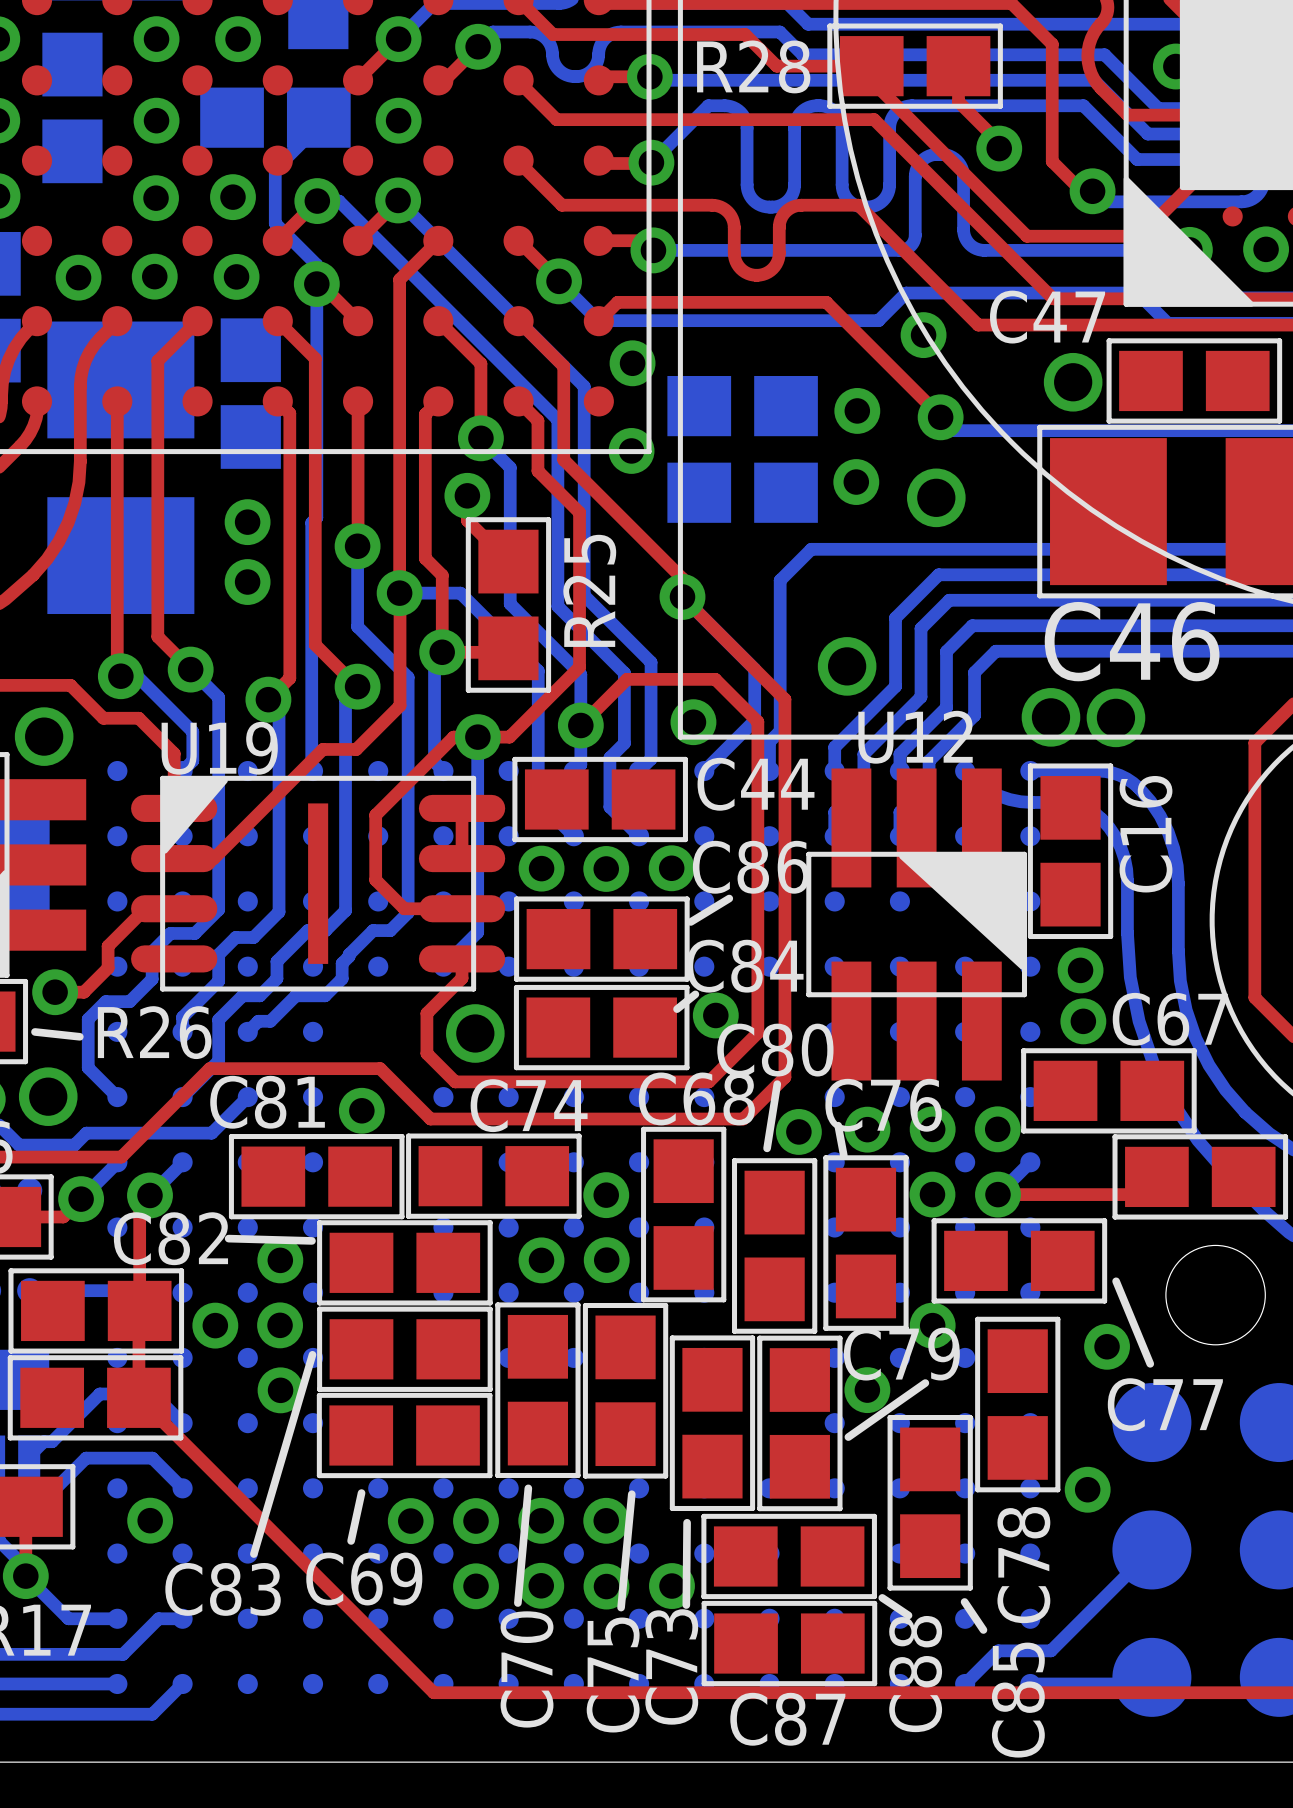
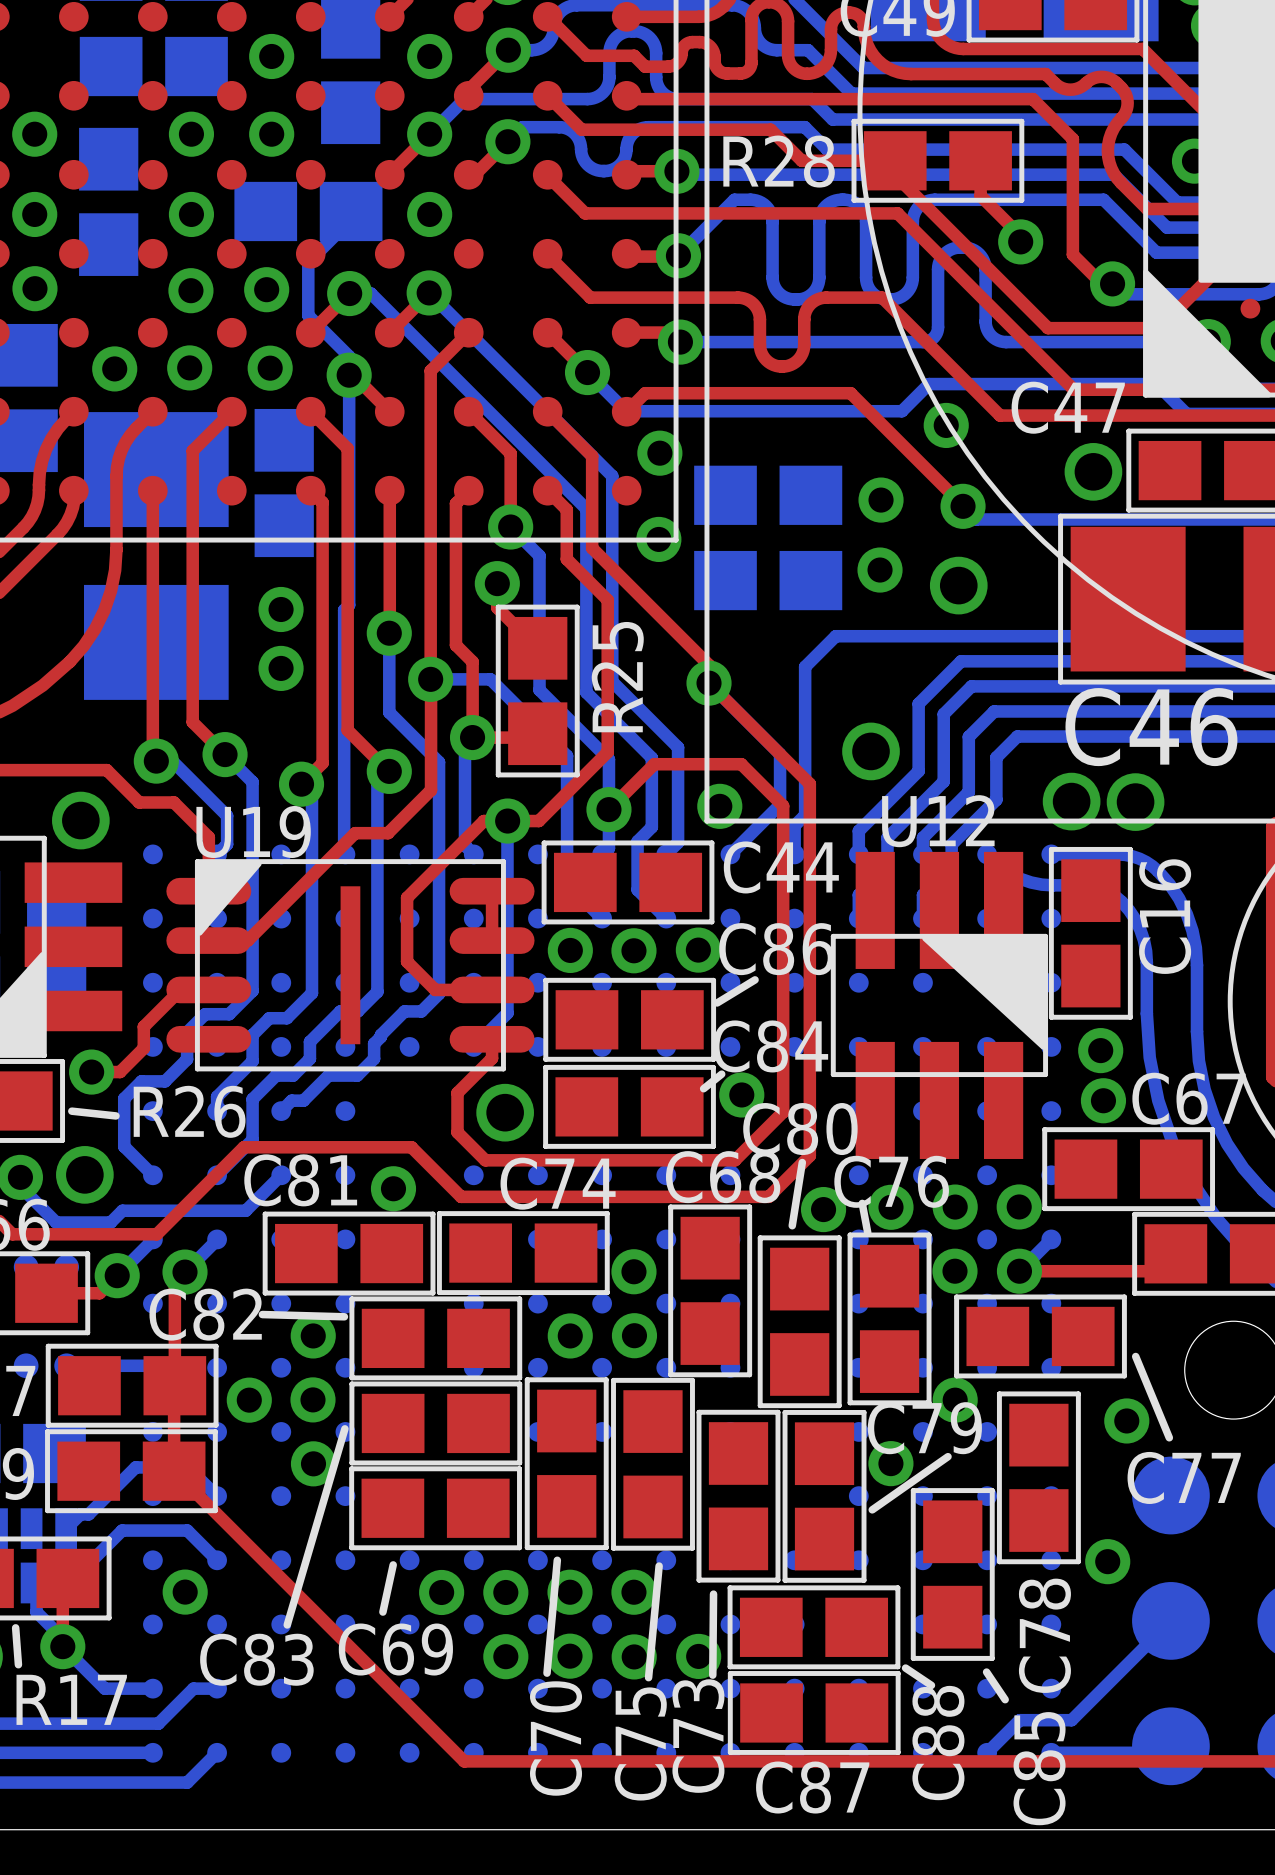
C76 name position: C76 (883, 1105) -> C76 (891, 1181)

